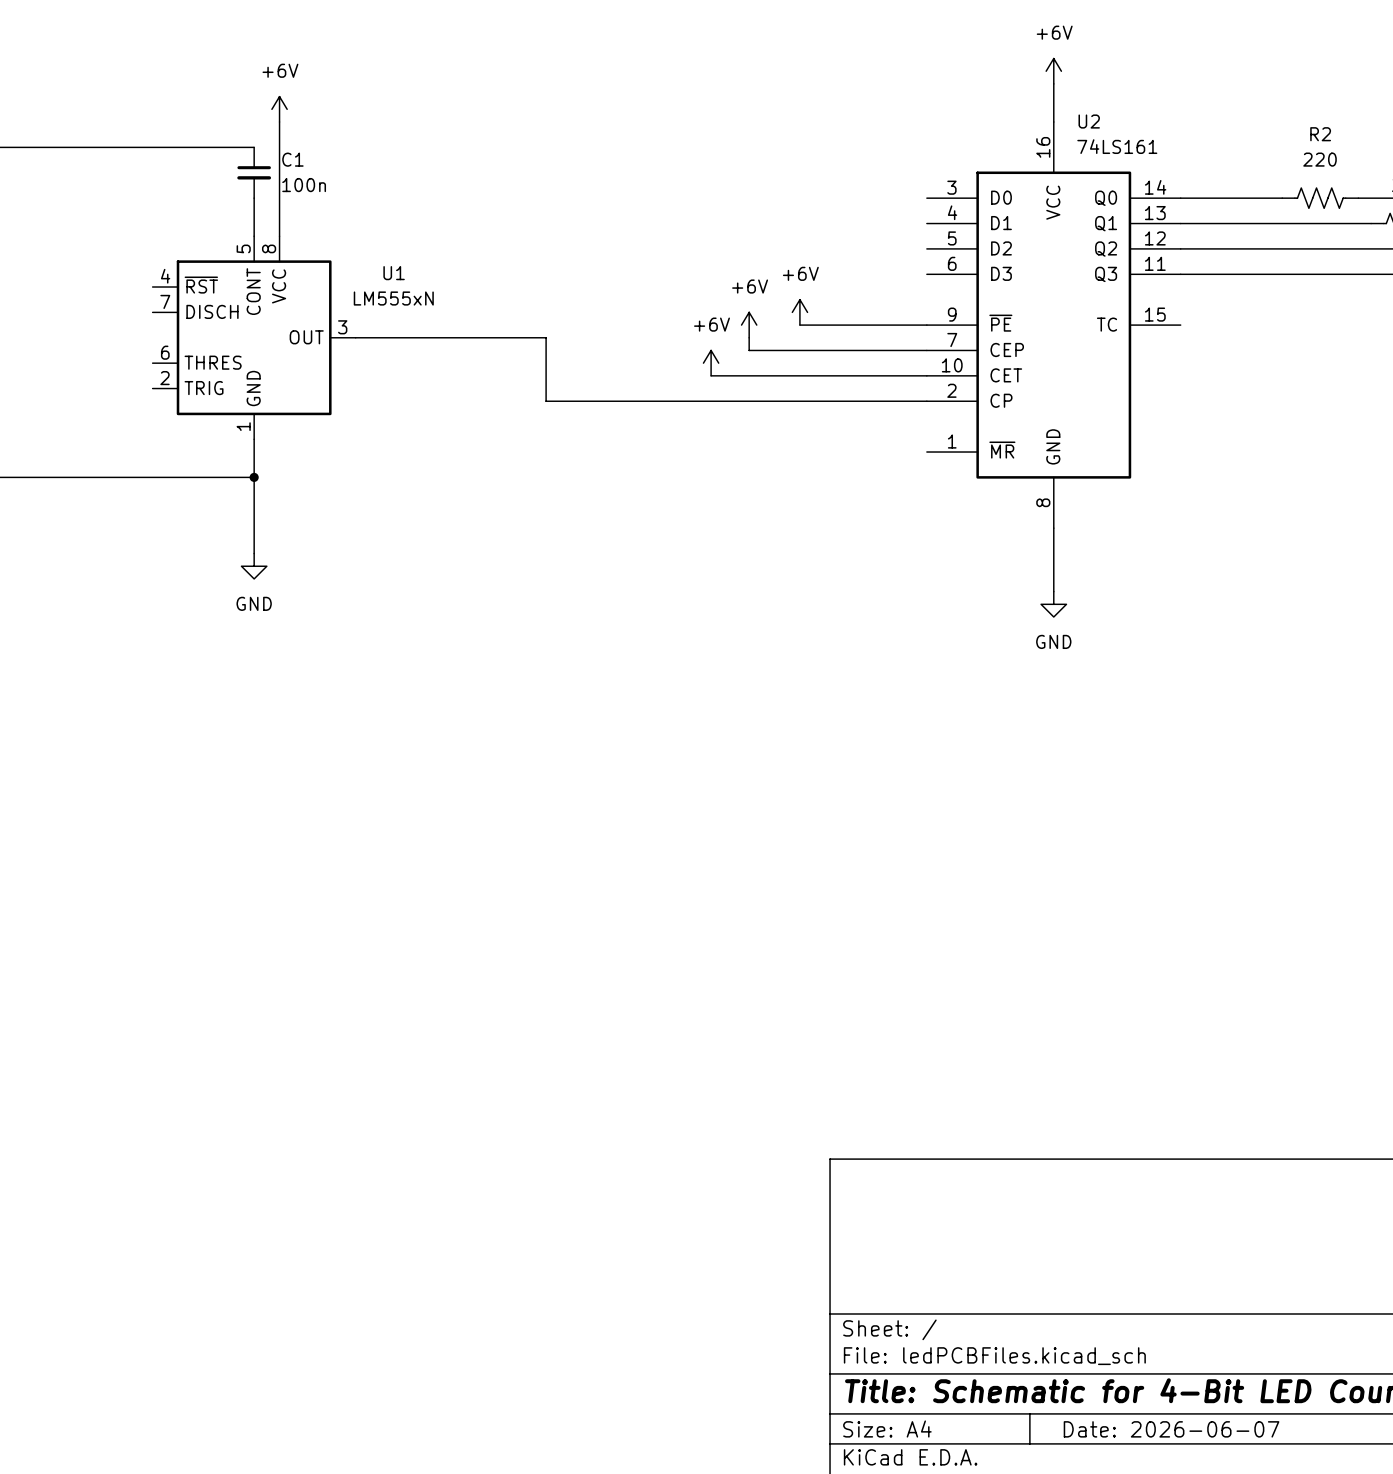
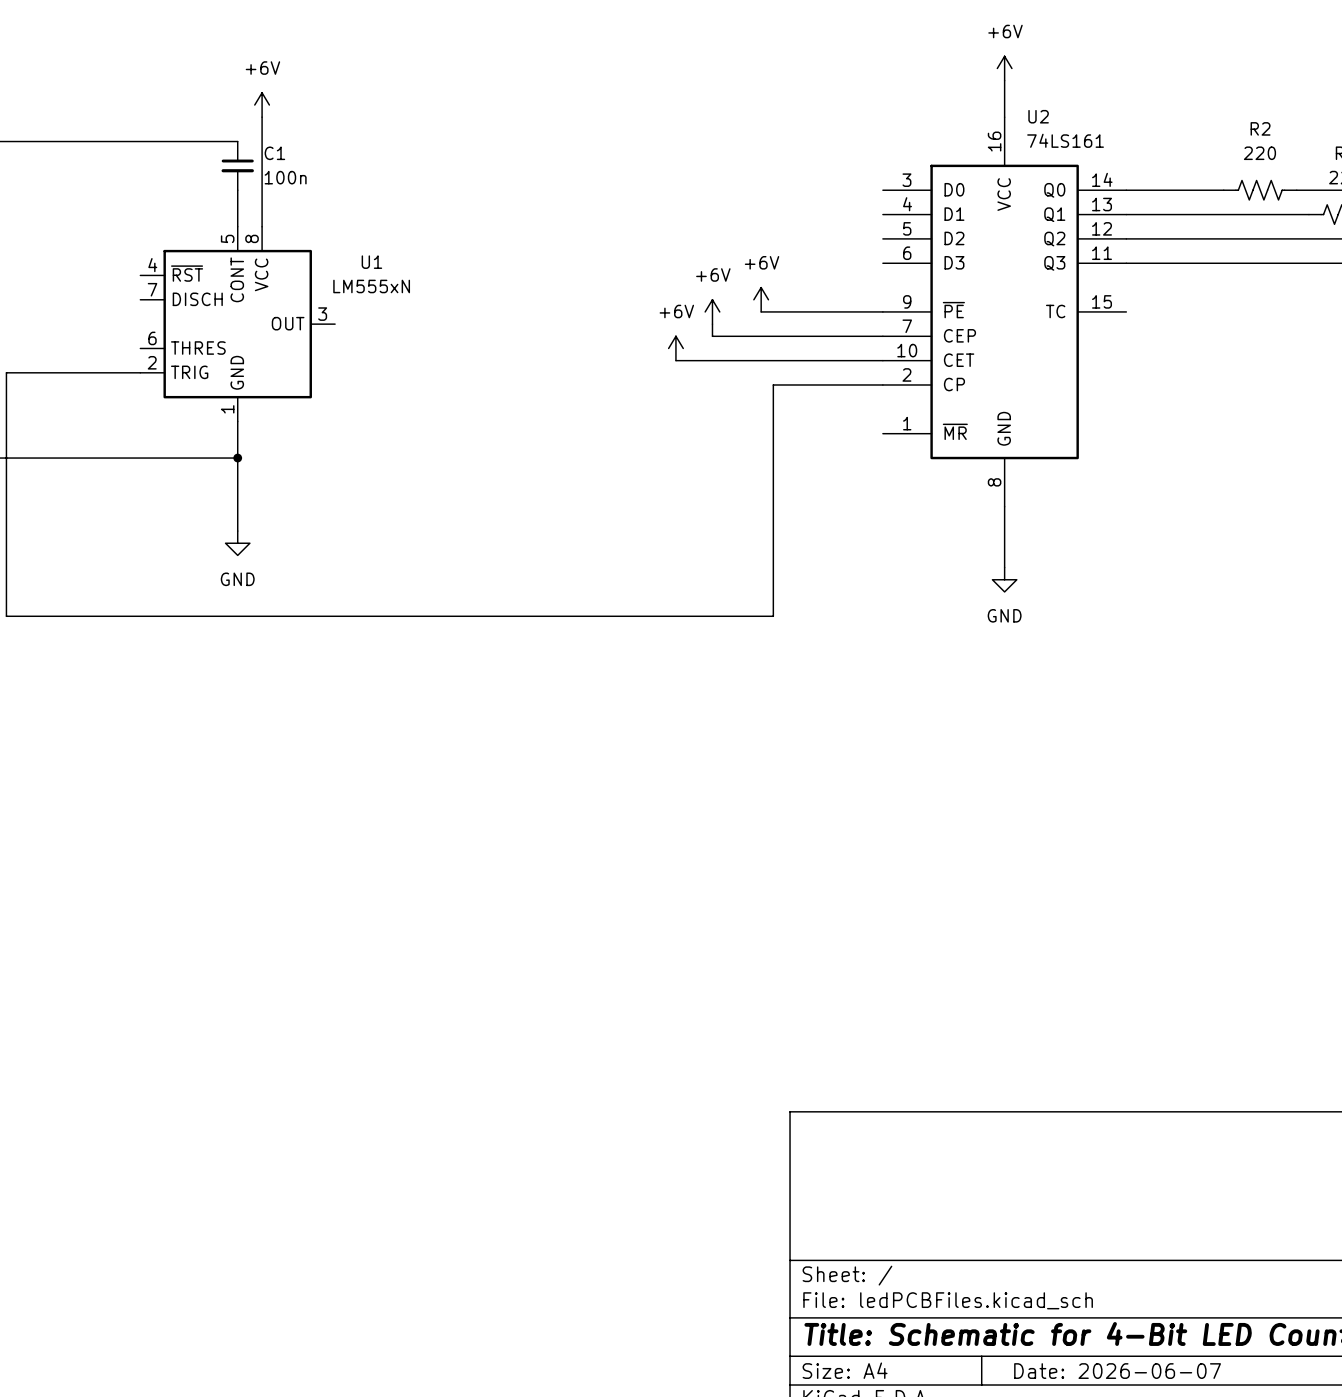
wire: (355, 337) (546, 337) (546, 401) (812, 401) -> (140, 372) (6, 372) (6, 616) (773, 616) (773, 384)

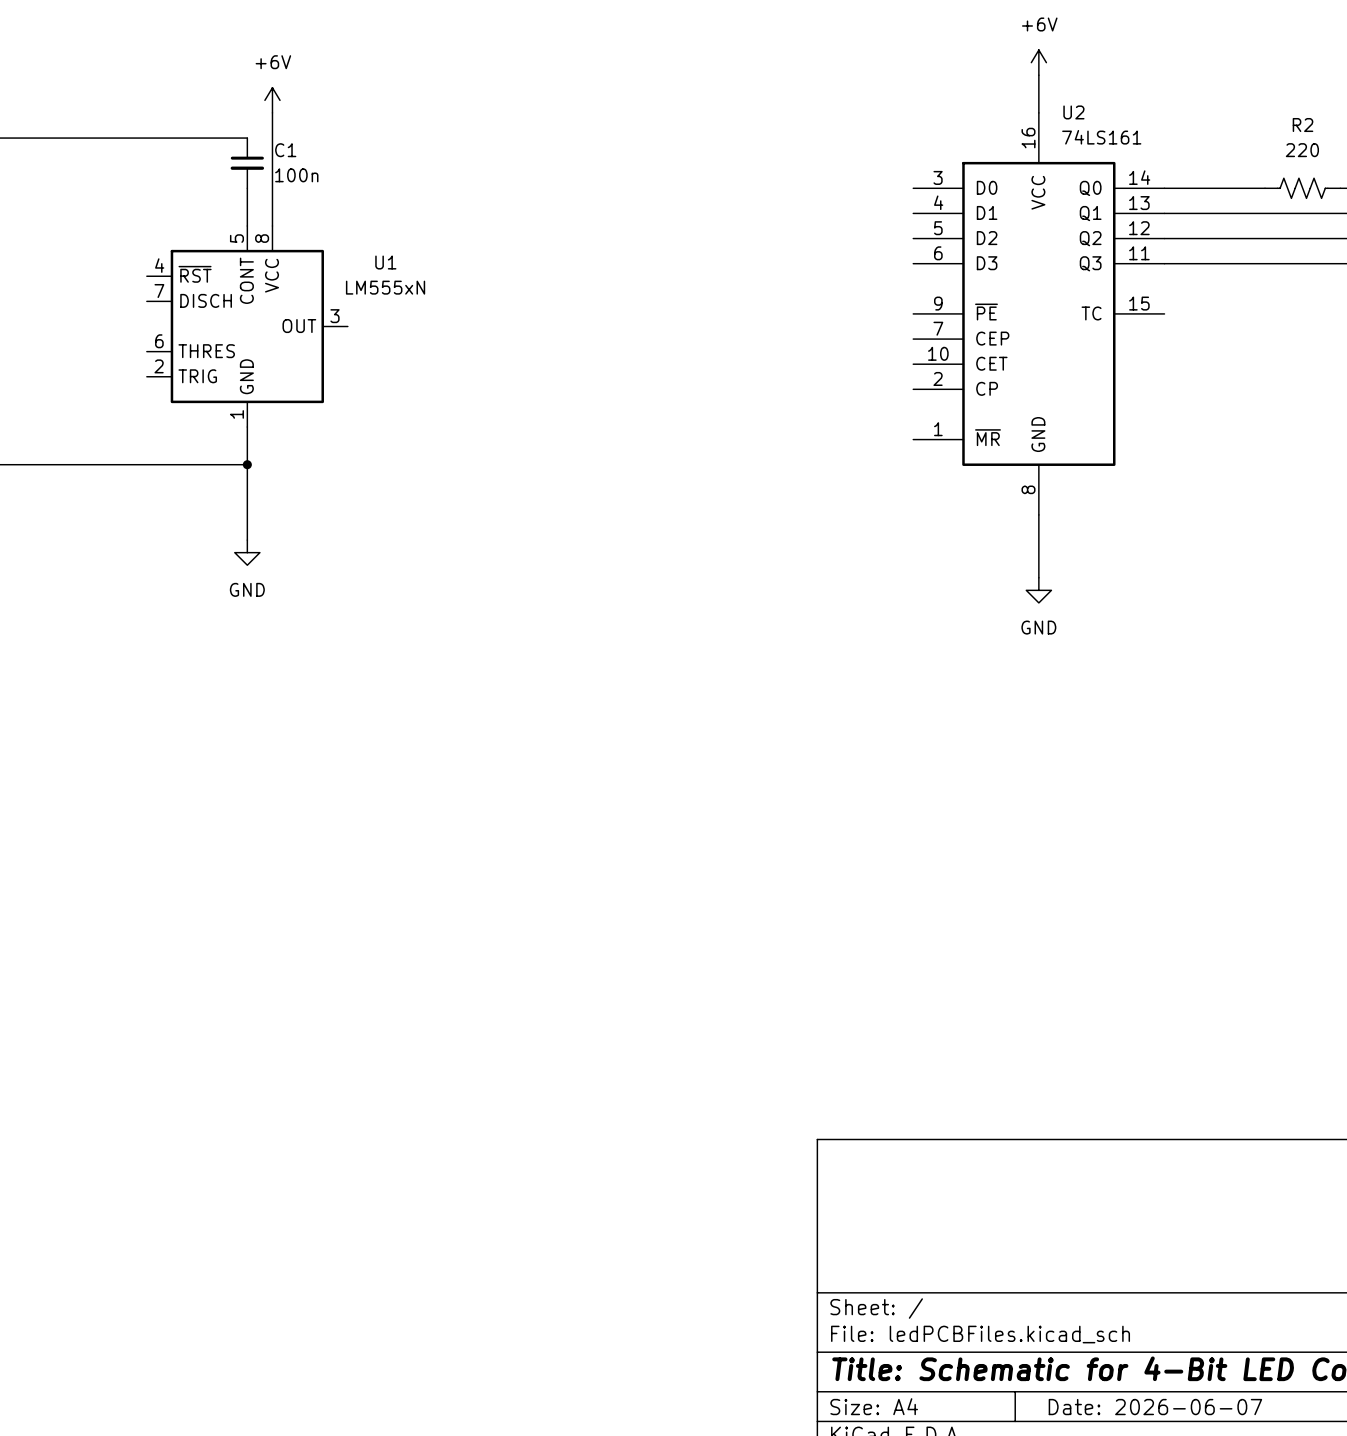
power symbol: +6V (761, 299) -> none
power symbol: +6V (712, 311) -> none
wire: (761, 311) (882, 311) -> none
wire: (712, 324) (712, 336) (882, 336) -> none
power symbol: +6V (675, 348) -> none
wire: (675, 360) (882, 360) -> none
wire: (140, 372) (6, 372) (6, 616) (773, 616) (773, 384) (882, 384) -> none

